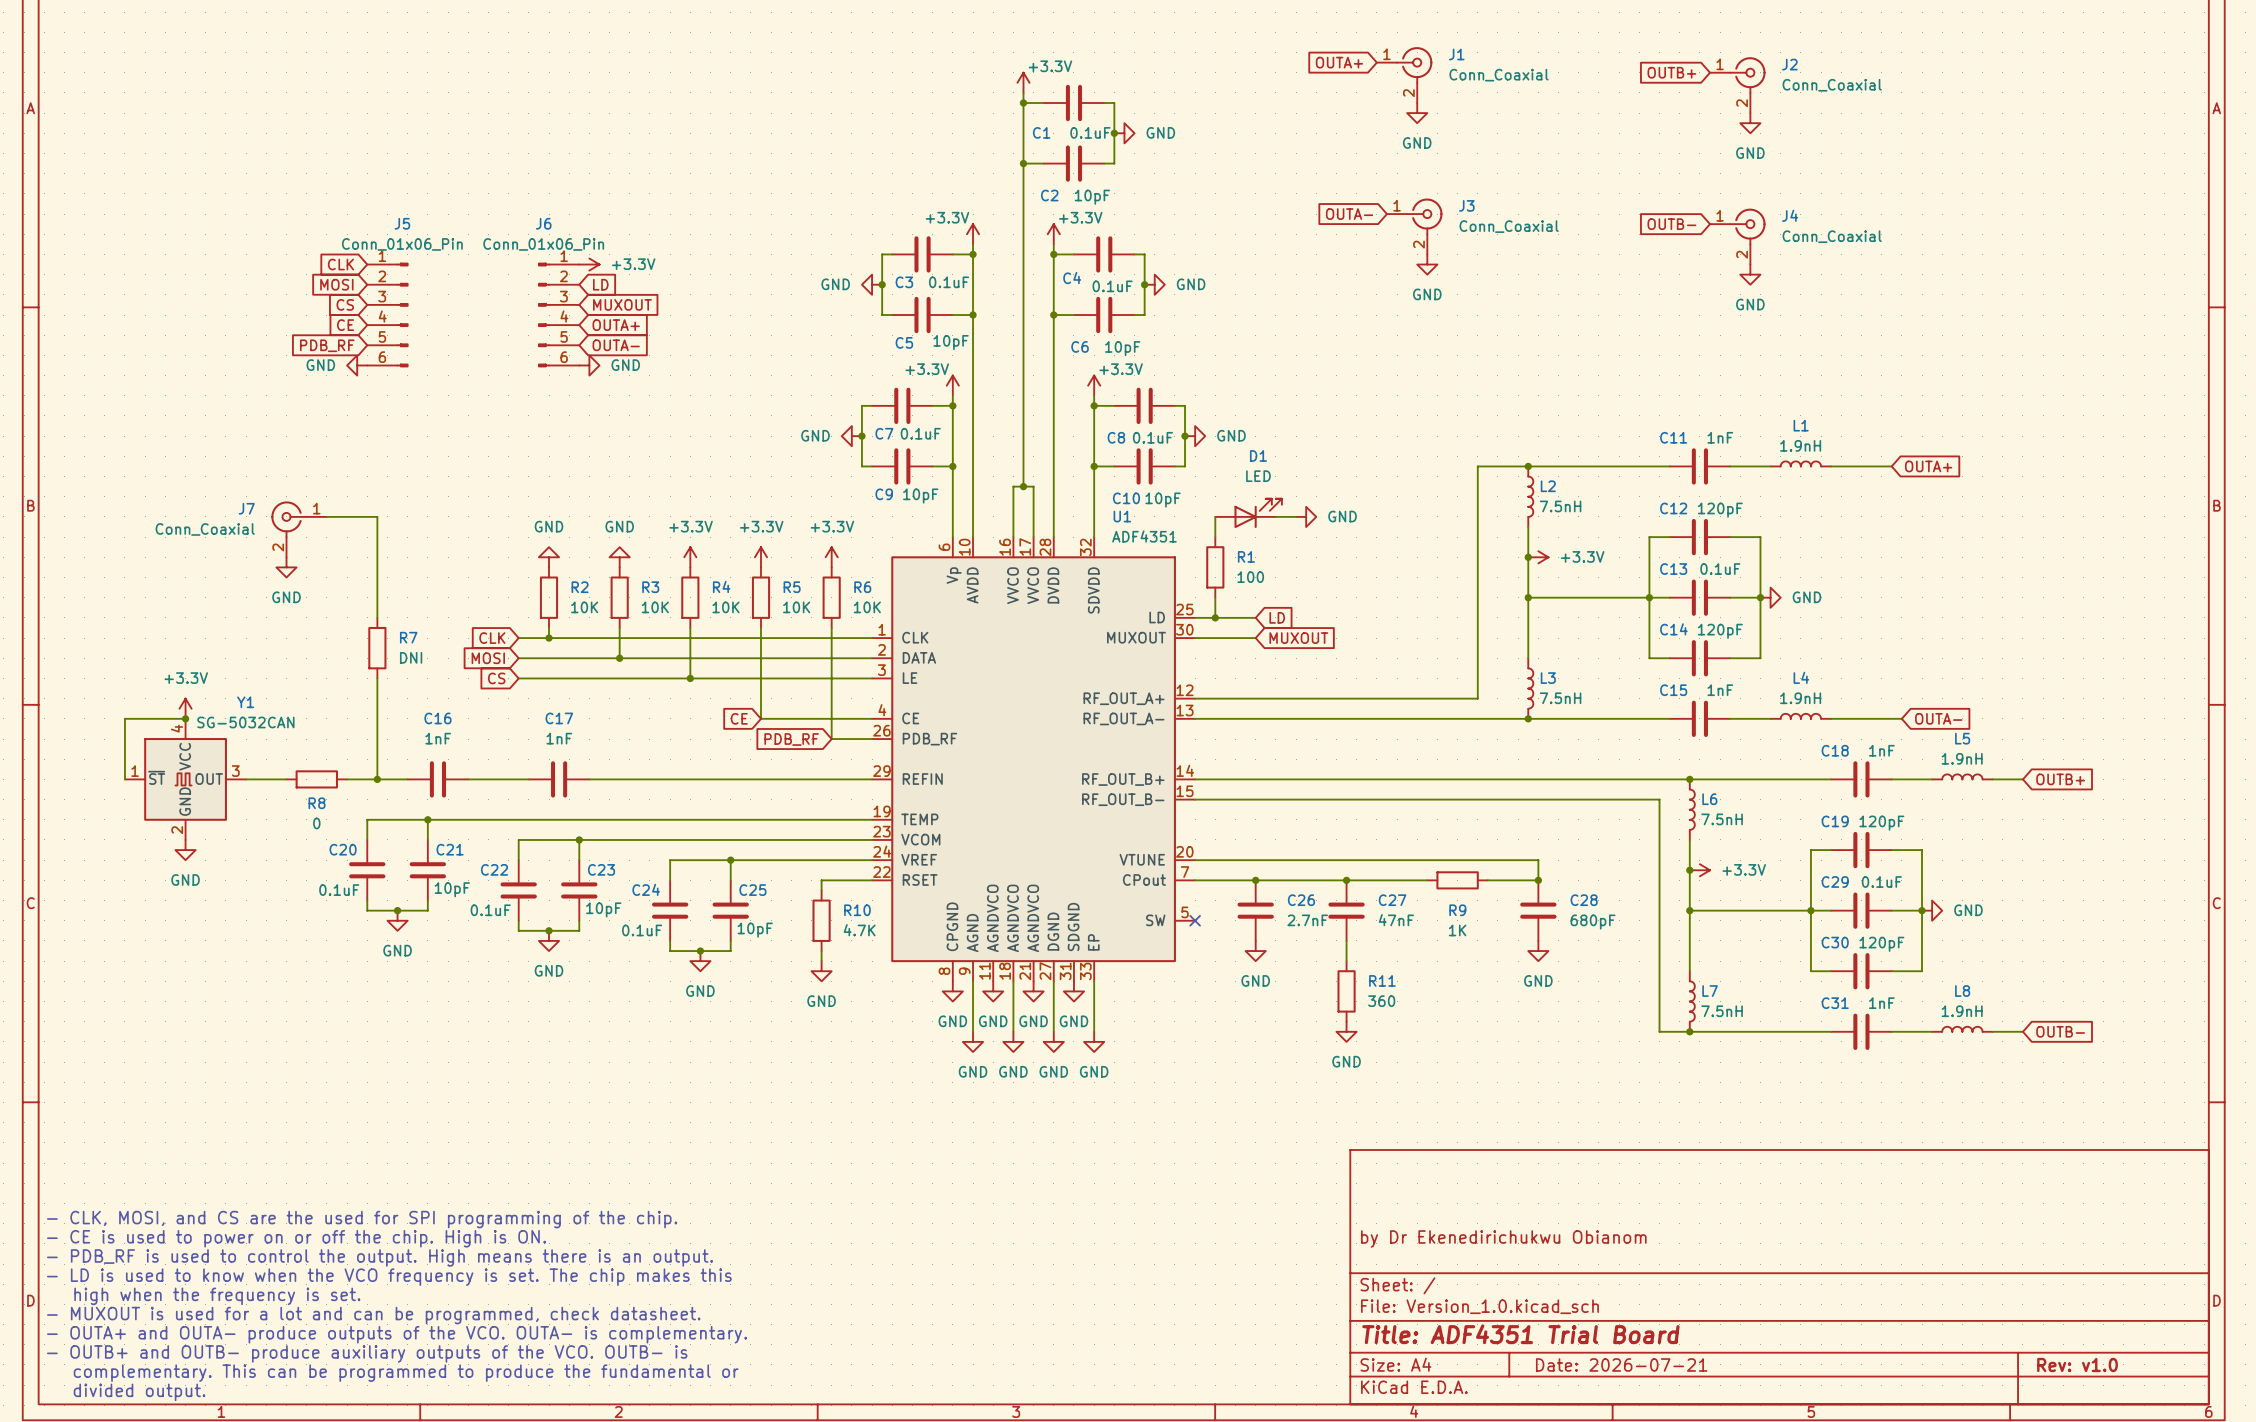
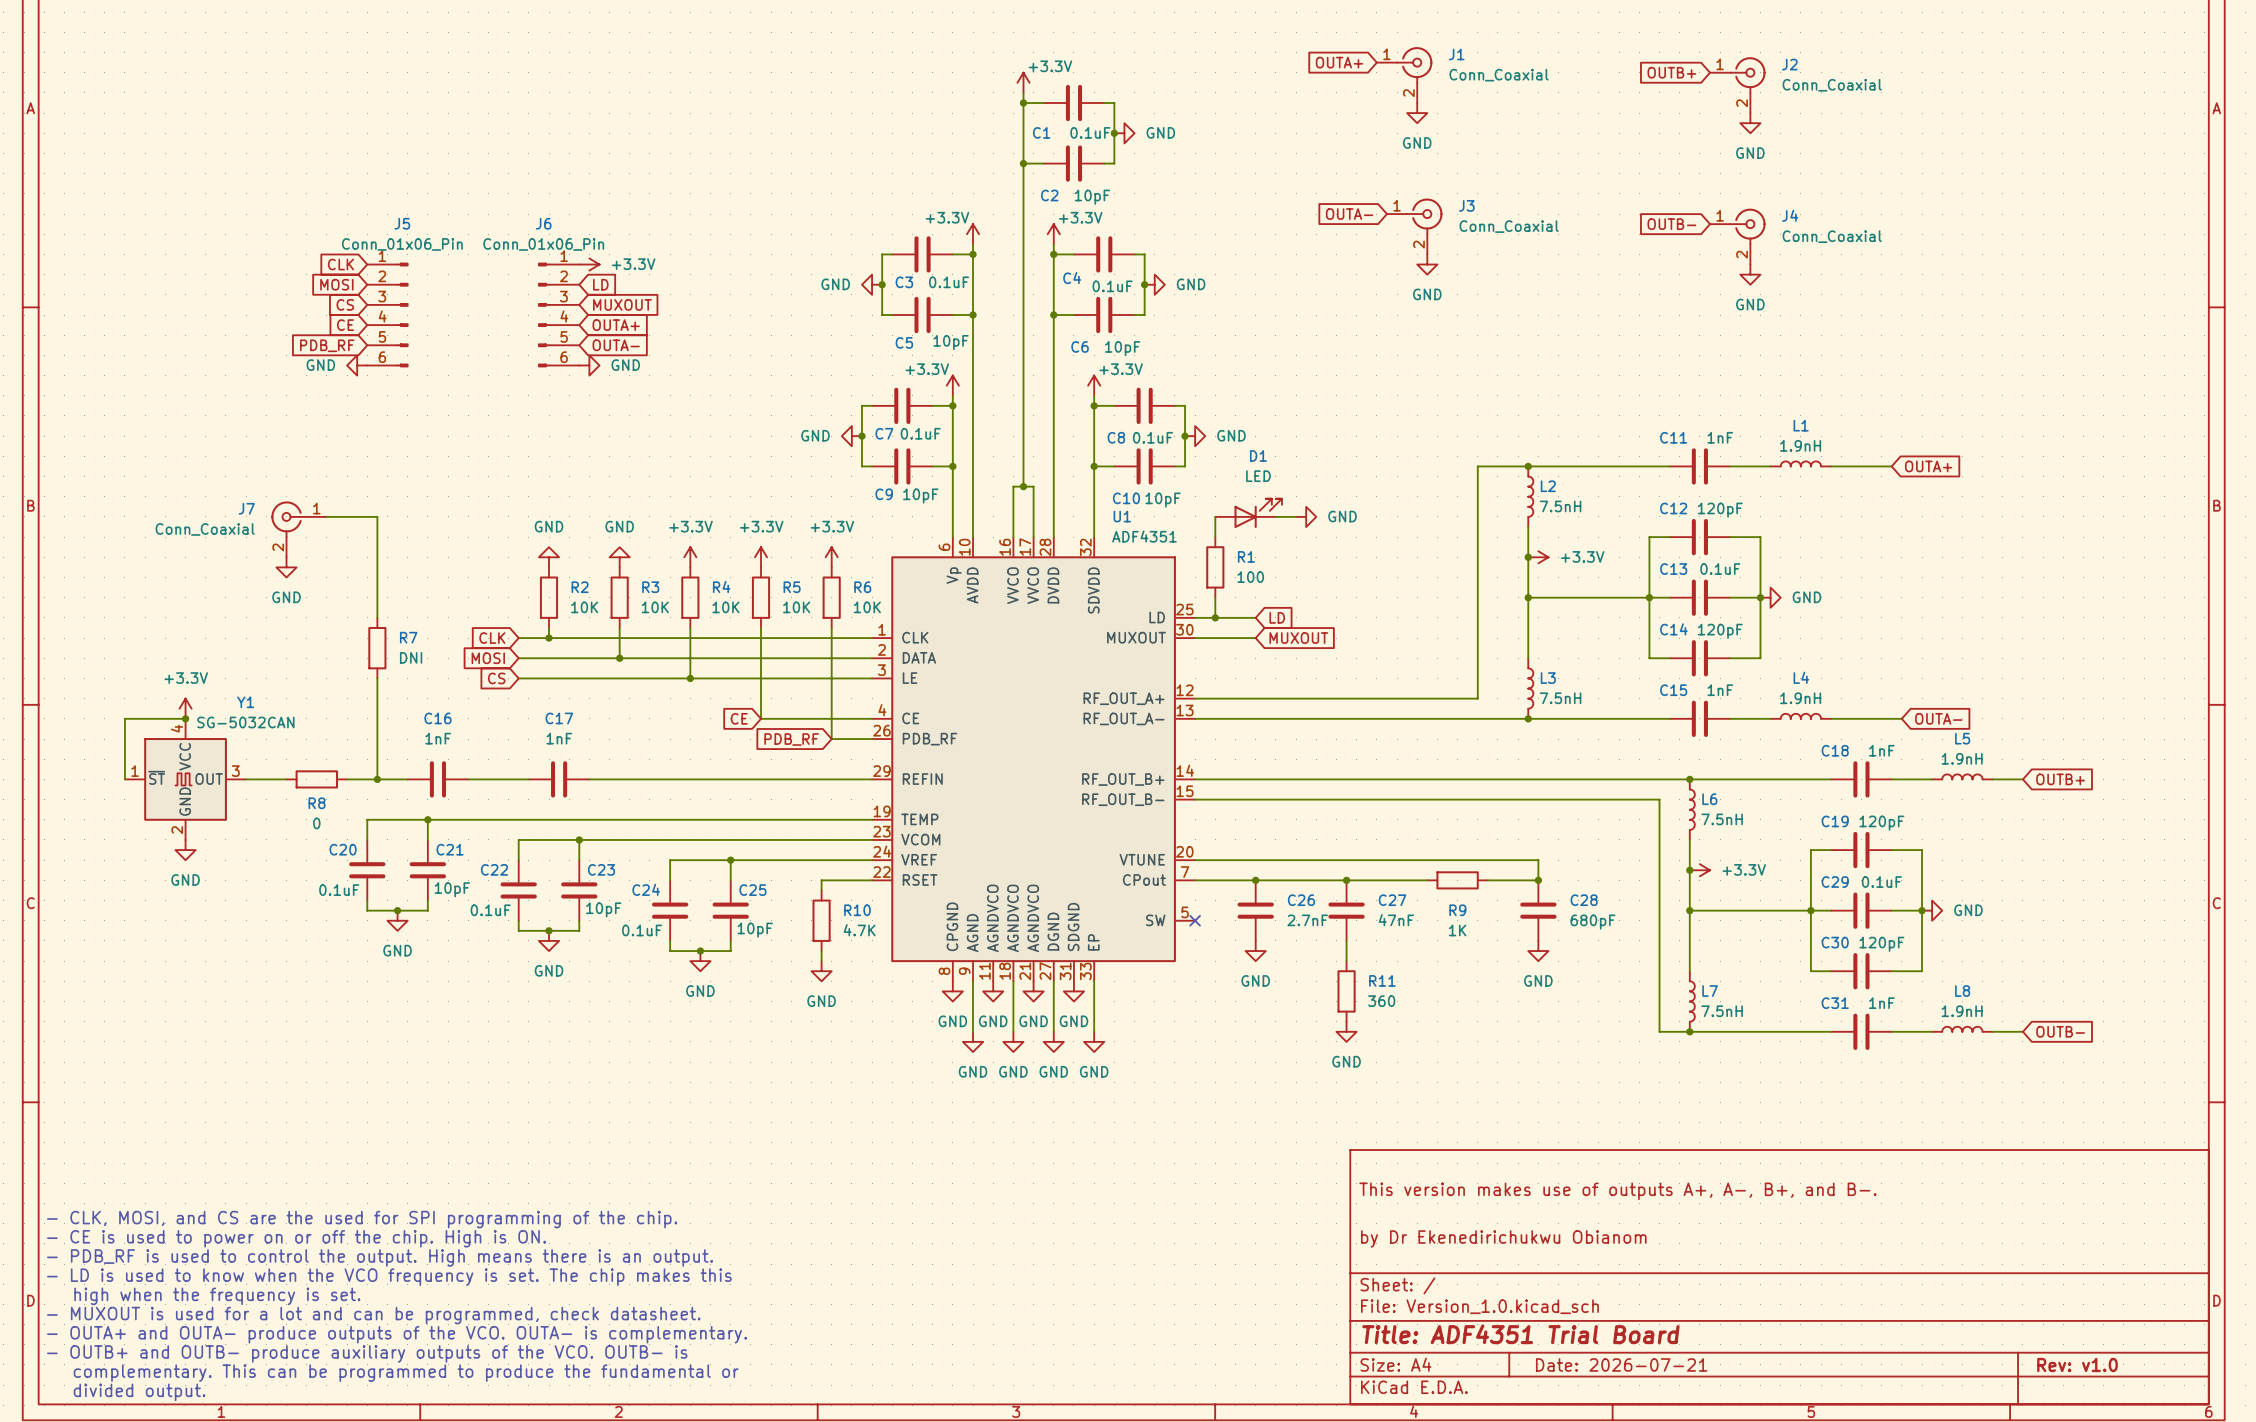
title block: none -> This version makes use of outputs A+, A-, B+, and B-. (1617, 1191)

